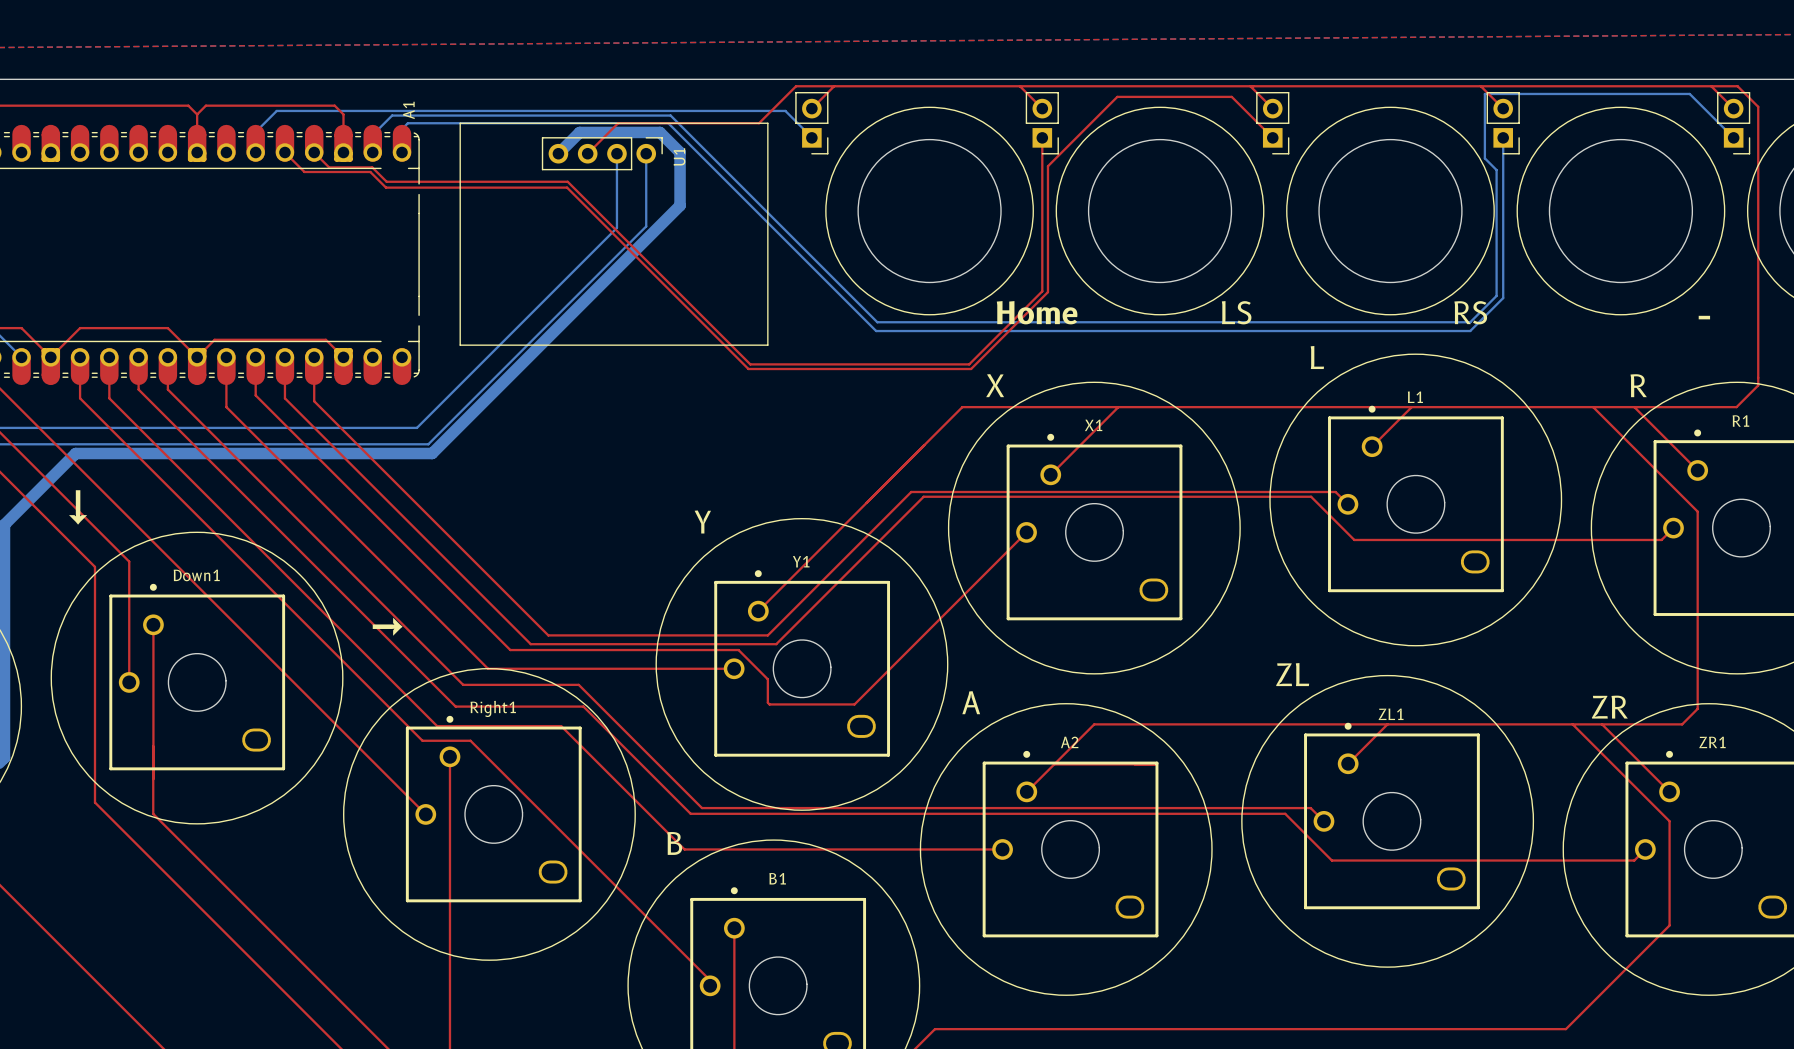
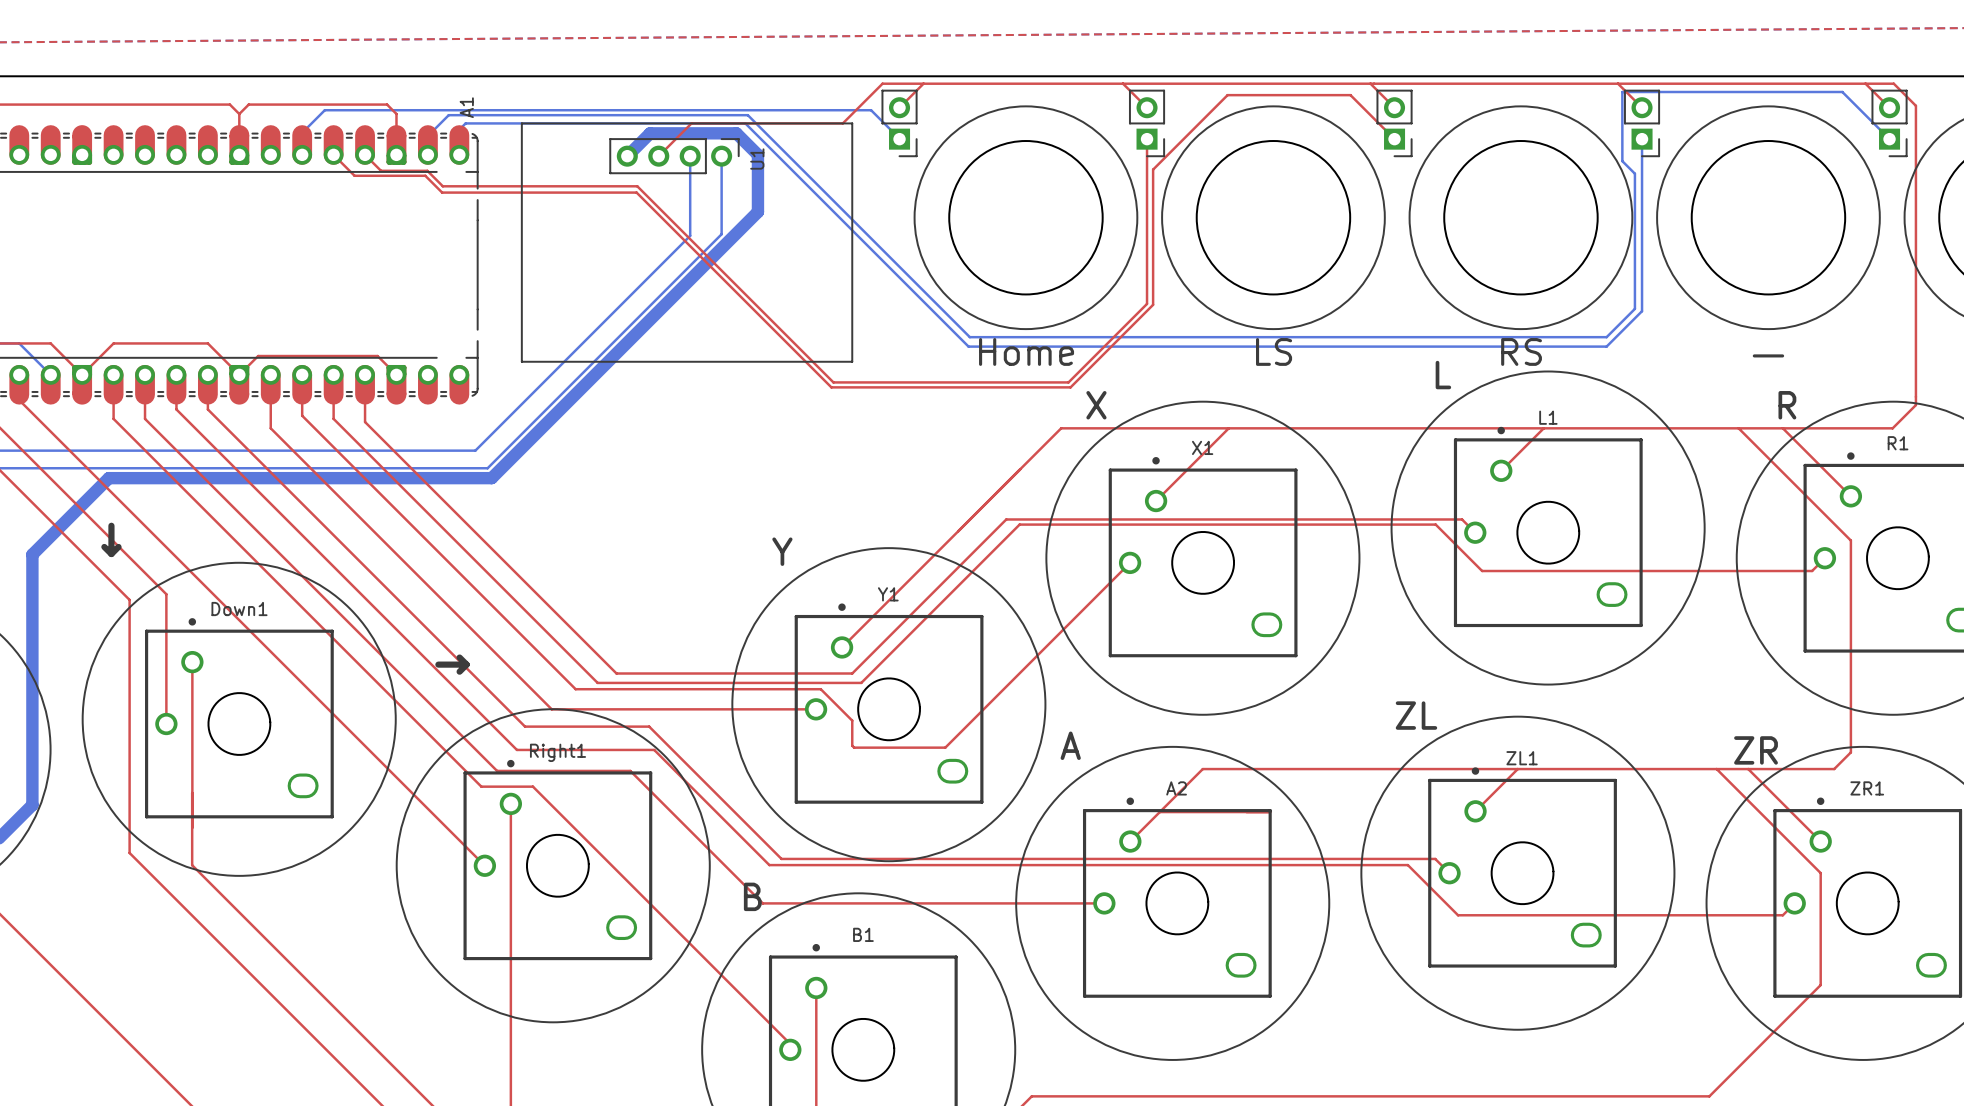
Home name position: Home (1037, 312) -> Home (1026, 351)
LS name position: LS (1236, 312) -> LS (1274, 351)
RS name position: RS (1470, 312) -> RS (1521, 351)
part name position: - (1704, 317) -> - (1768, 355)

